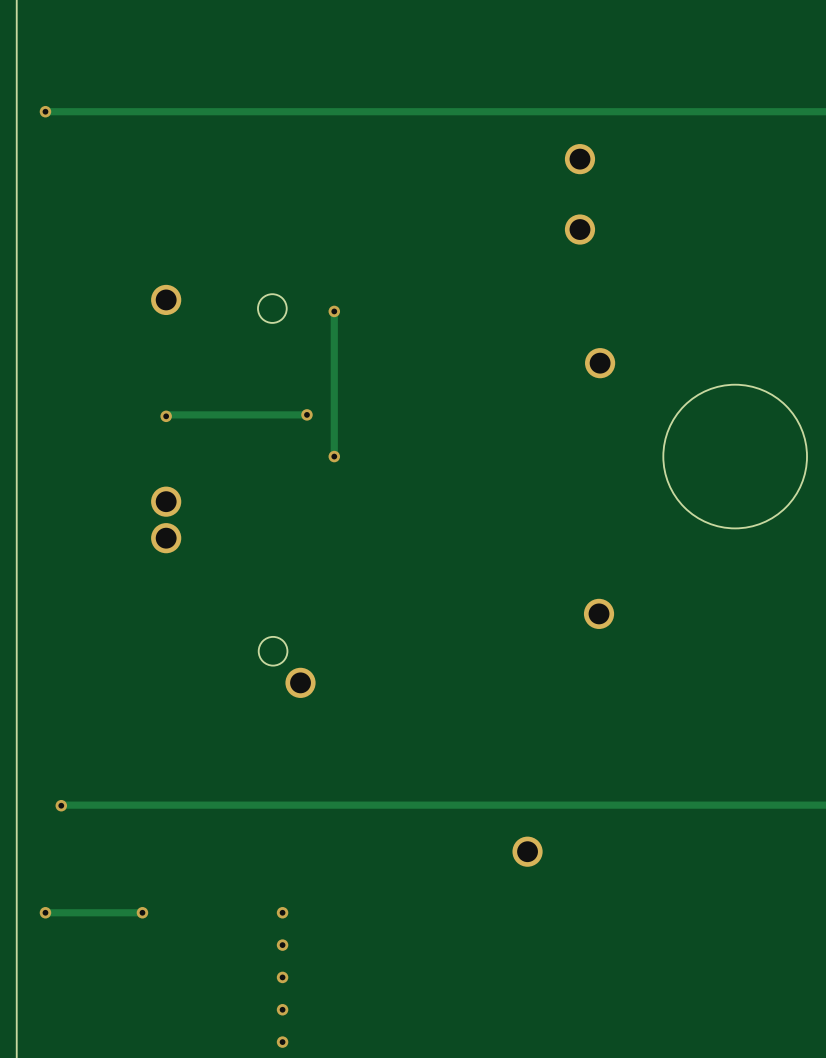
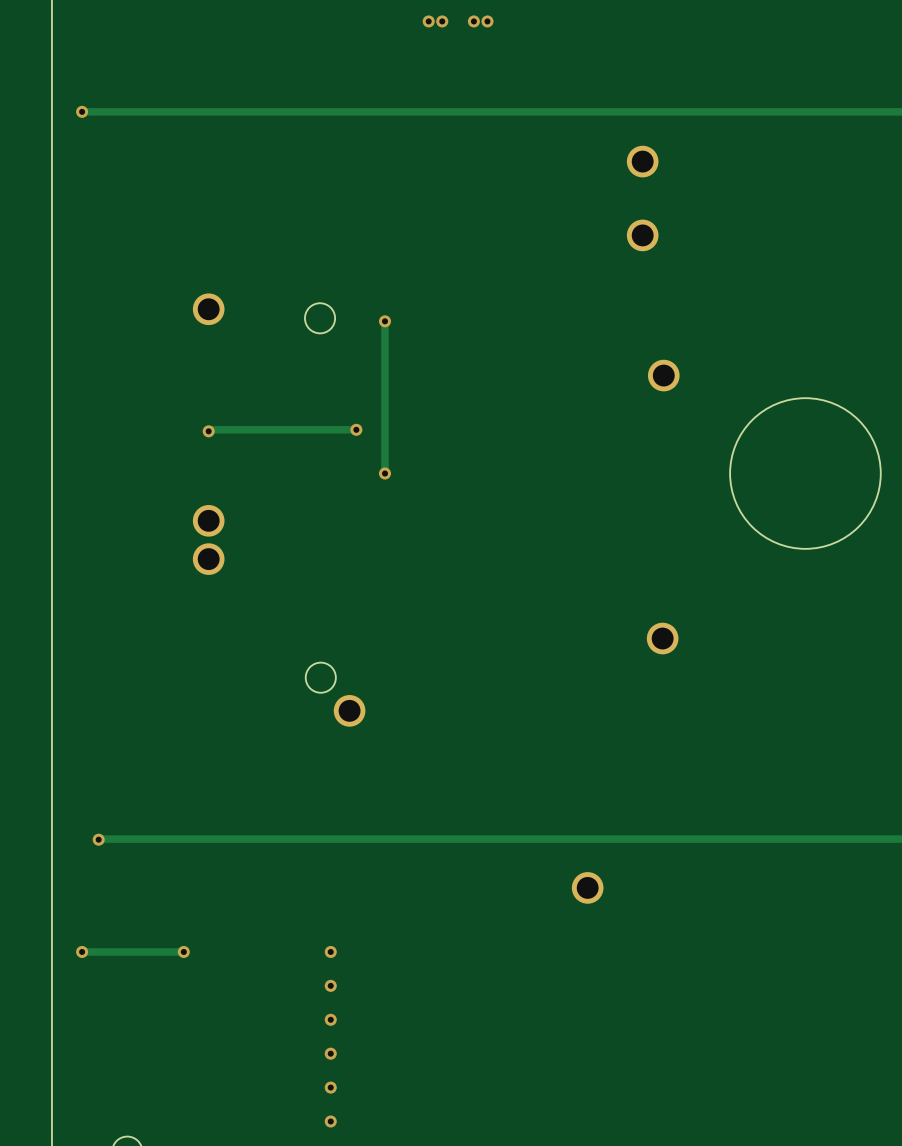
via: none -> (428, 21)
via: none -> (442, 21)
via: none -> (473, 21)
via: none -> (487, 21)

